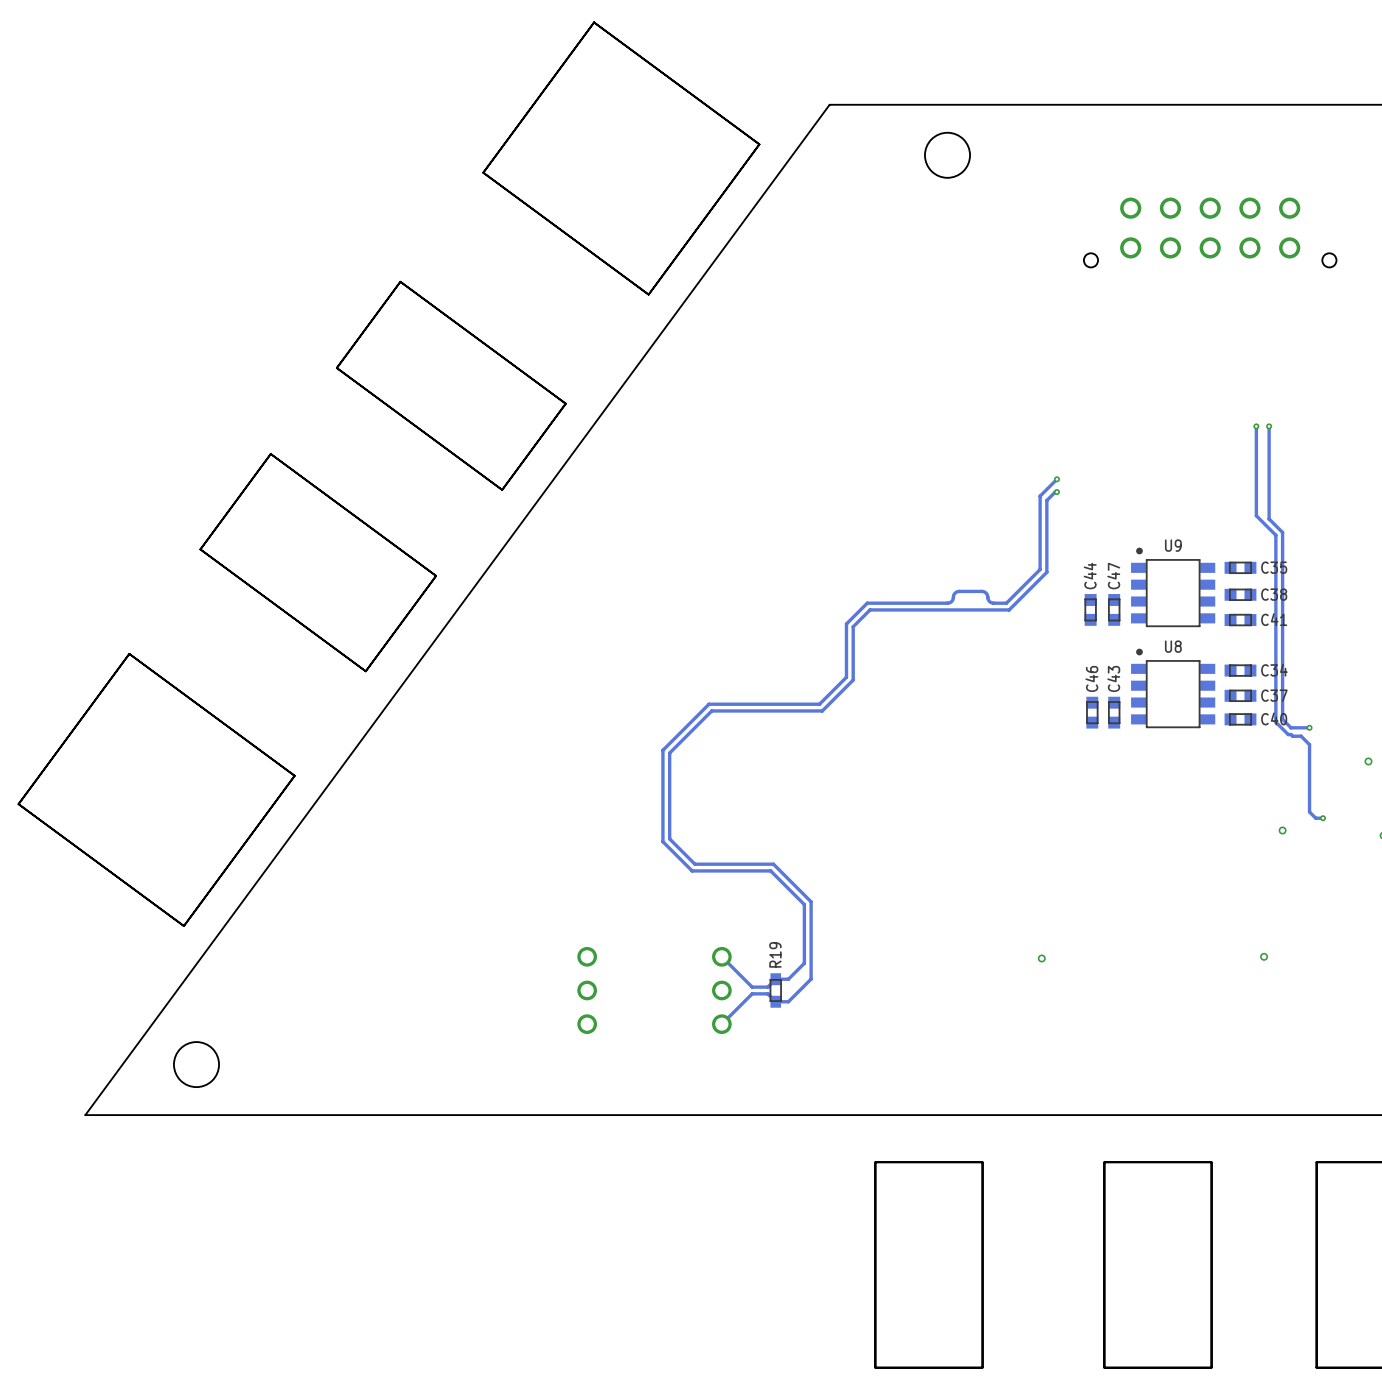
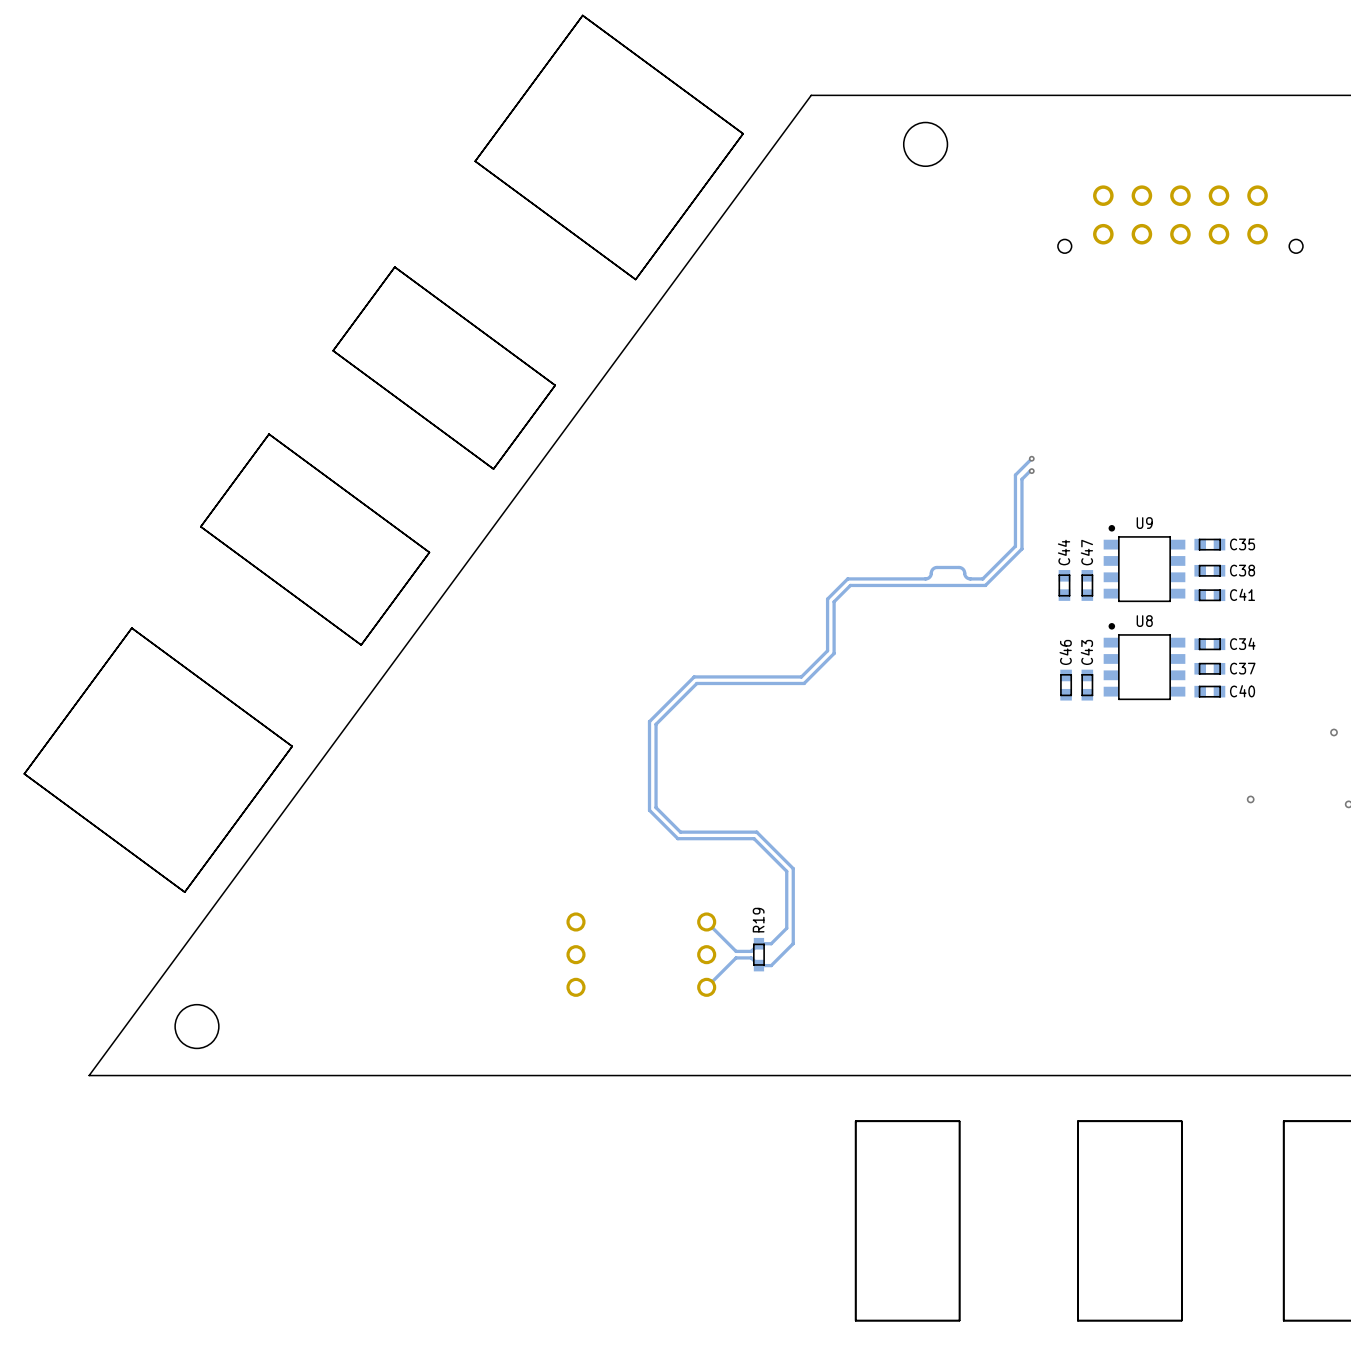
track: (1256, 426) (1256, 515) (1275, 535) (1275, 722) (1288, 734) (1301, 736) (1309, 744) (1309, 812) (1315, 818) (1323, 818) -> none
via: (1256, 426) -> none
track: (1269, 426) (1269, 519) (1282, 532) (1282, 719) (1291, 727) (1309, 727) -> none
via: (1269, 426) -> none
via: (1309, 727) -> none
via: (1323, 818) -> none
via: (1264, 956) -> none
via: (1041, 958) -> none

